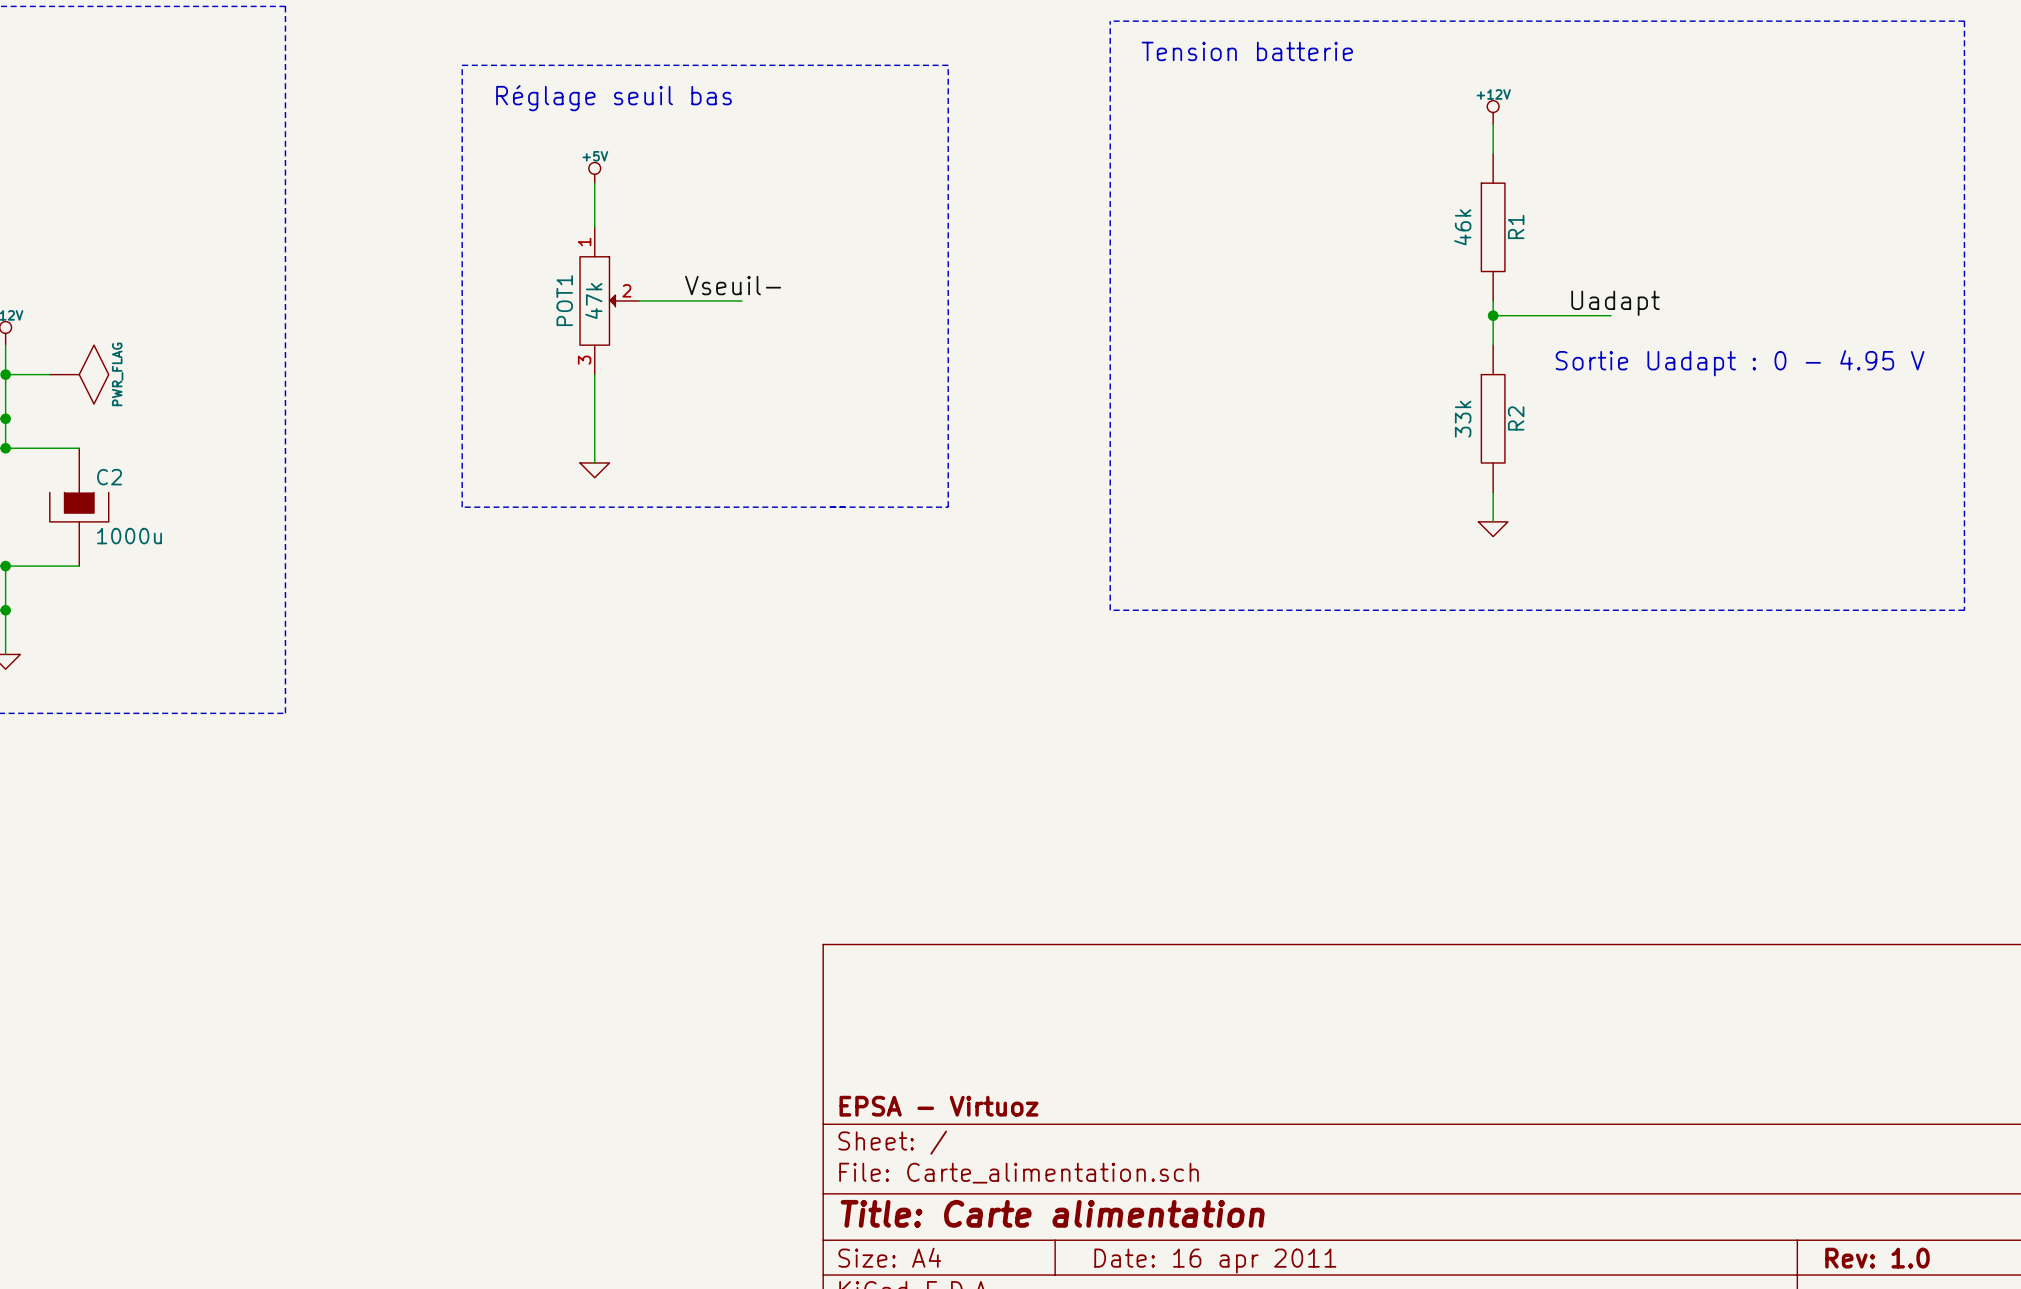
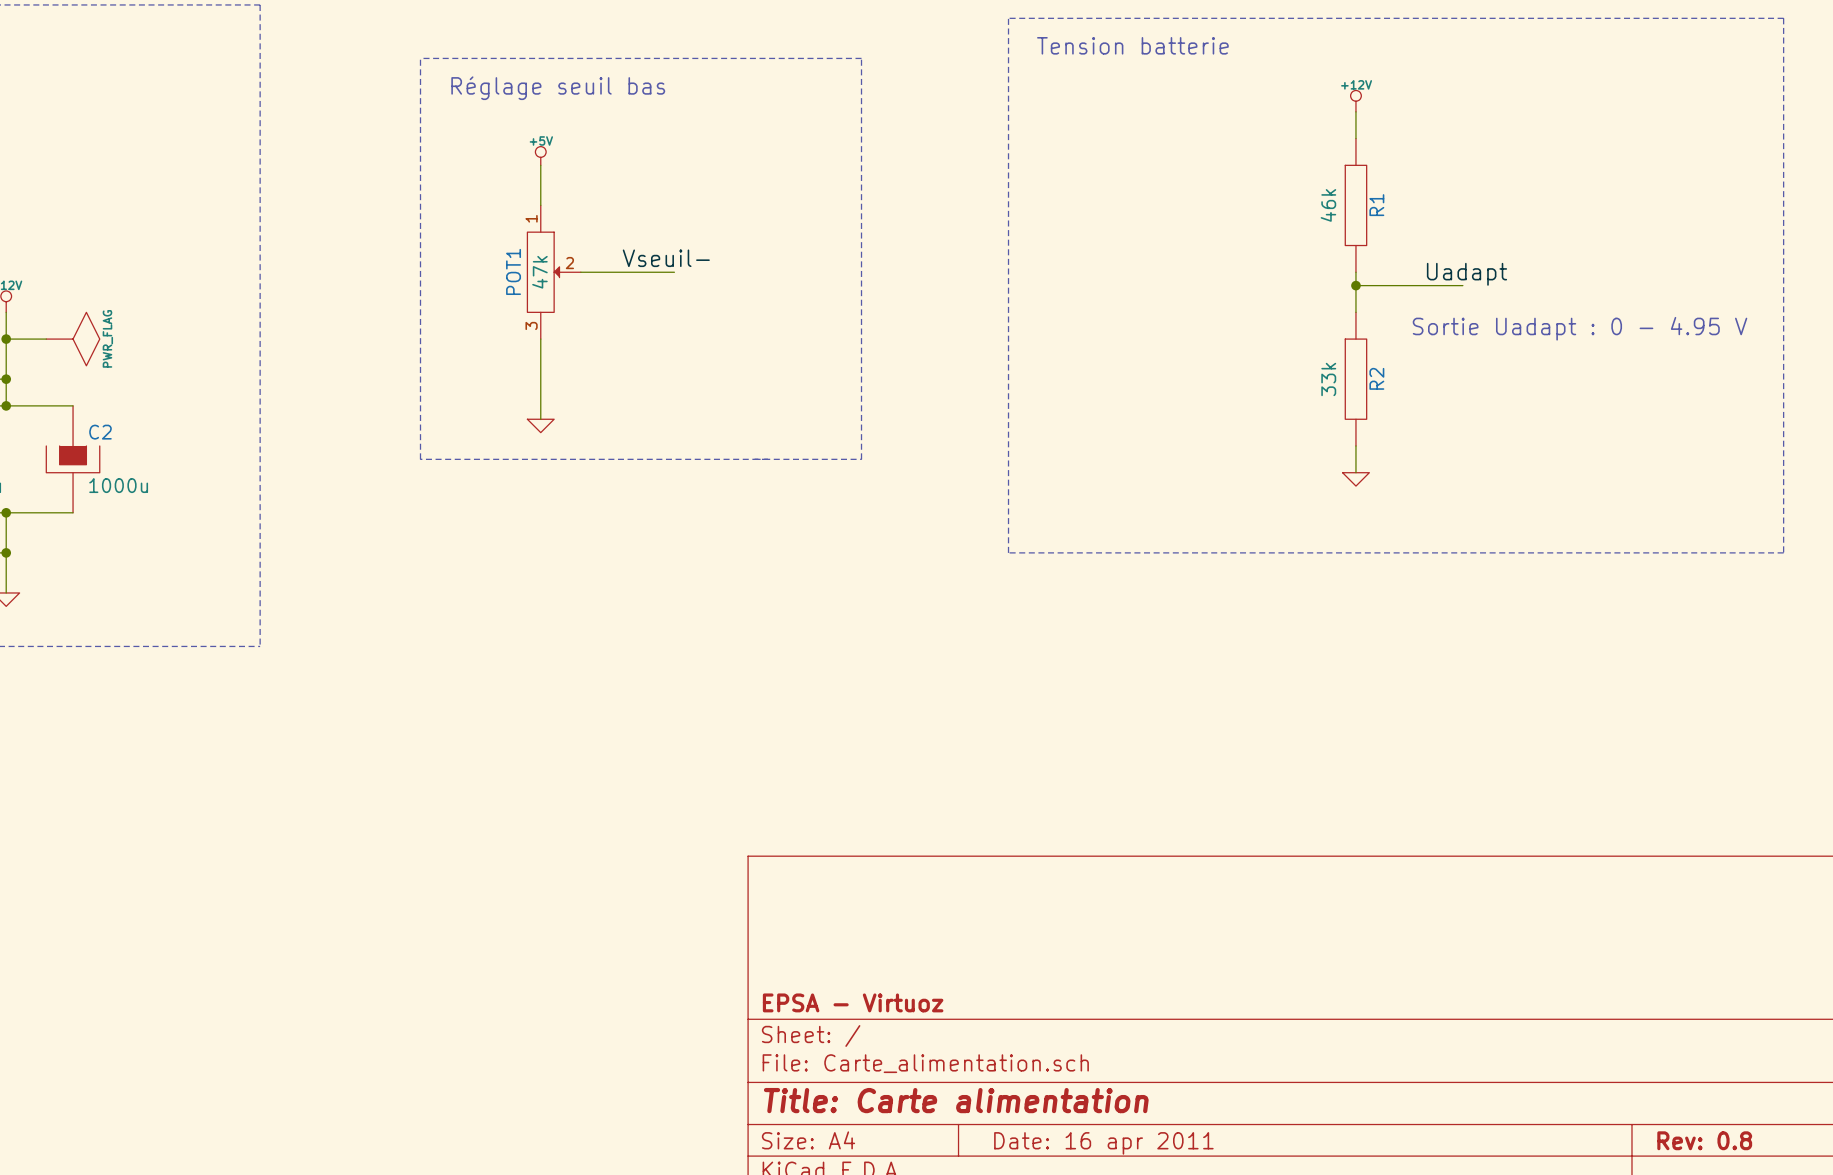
title block: Rev: 1.0 (1877, 1258) -> Rev: 0.8 (1704, 1140)

